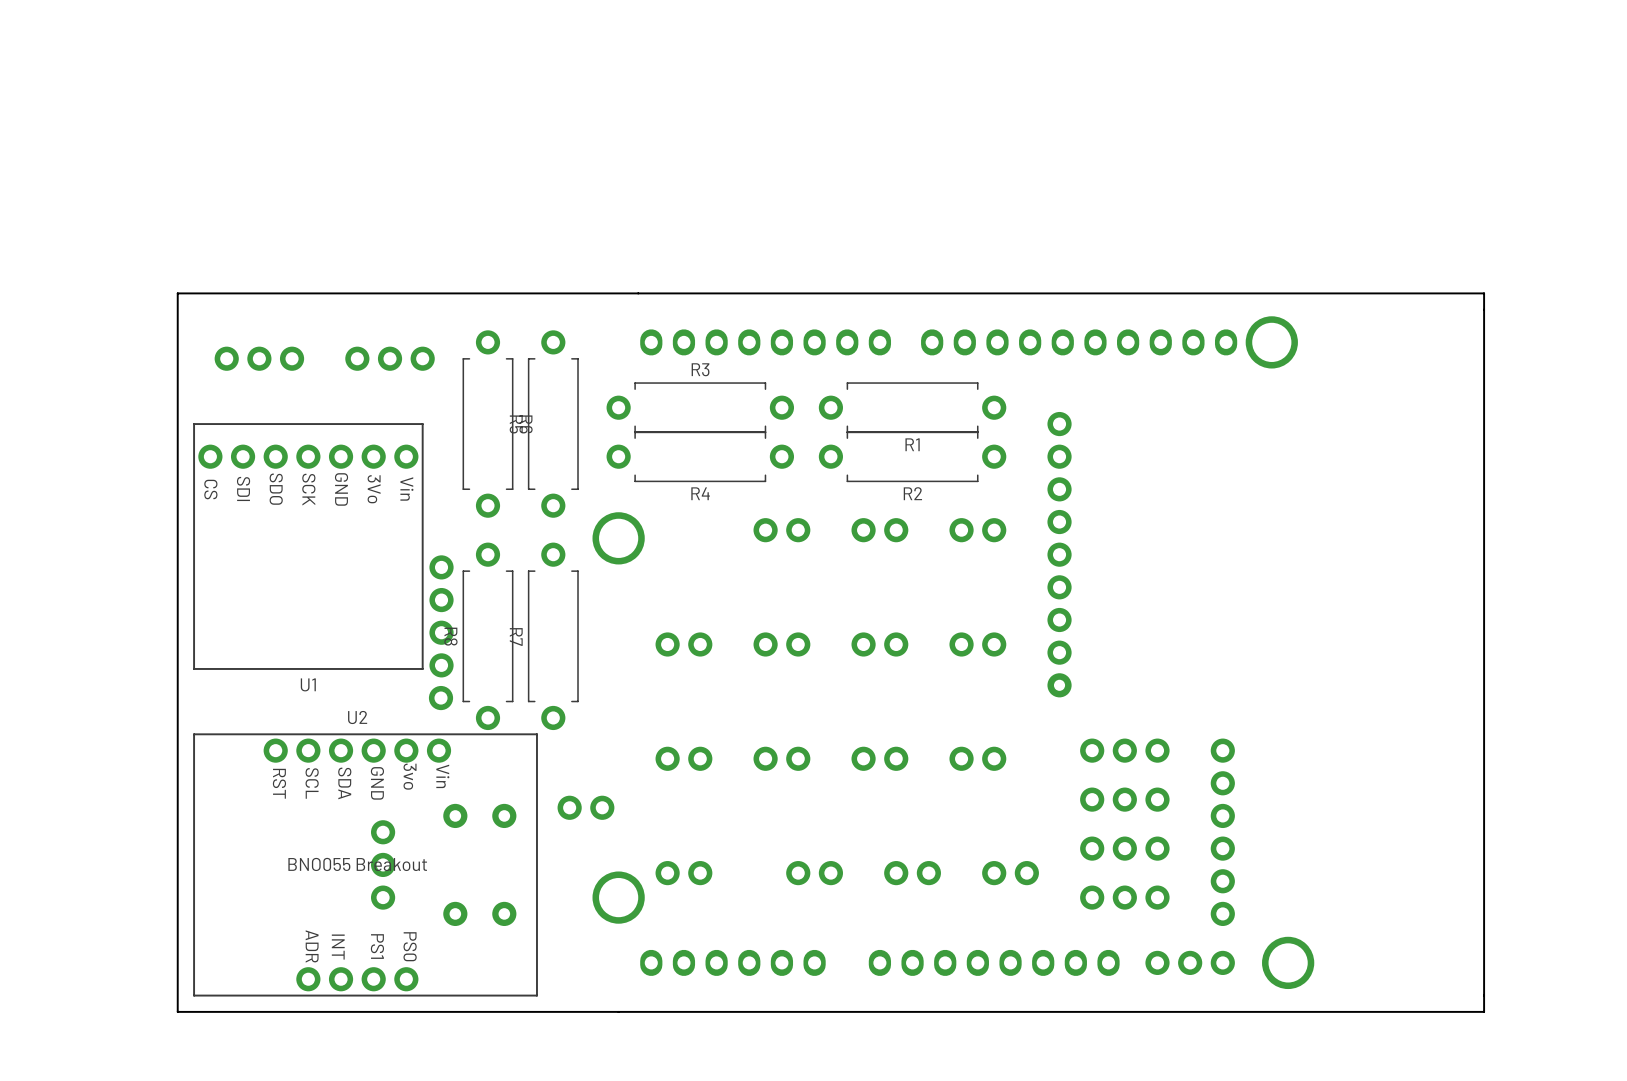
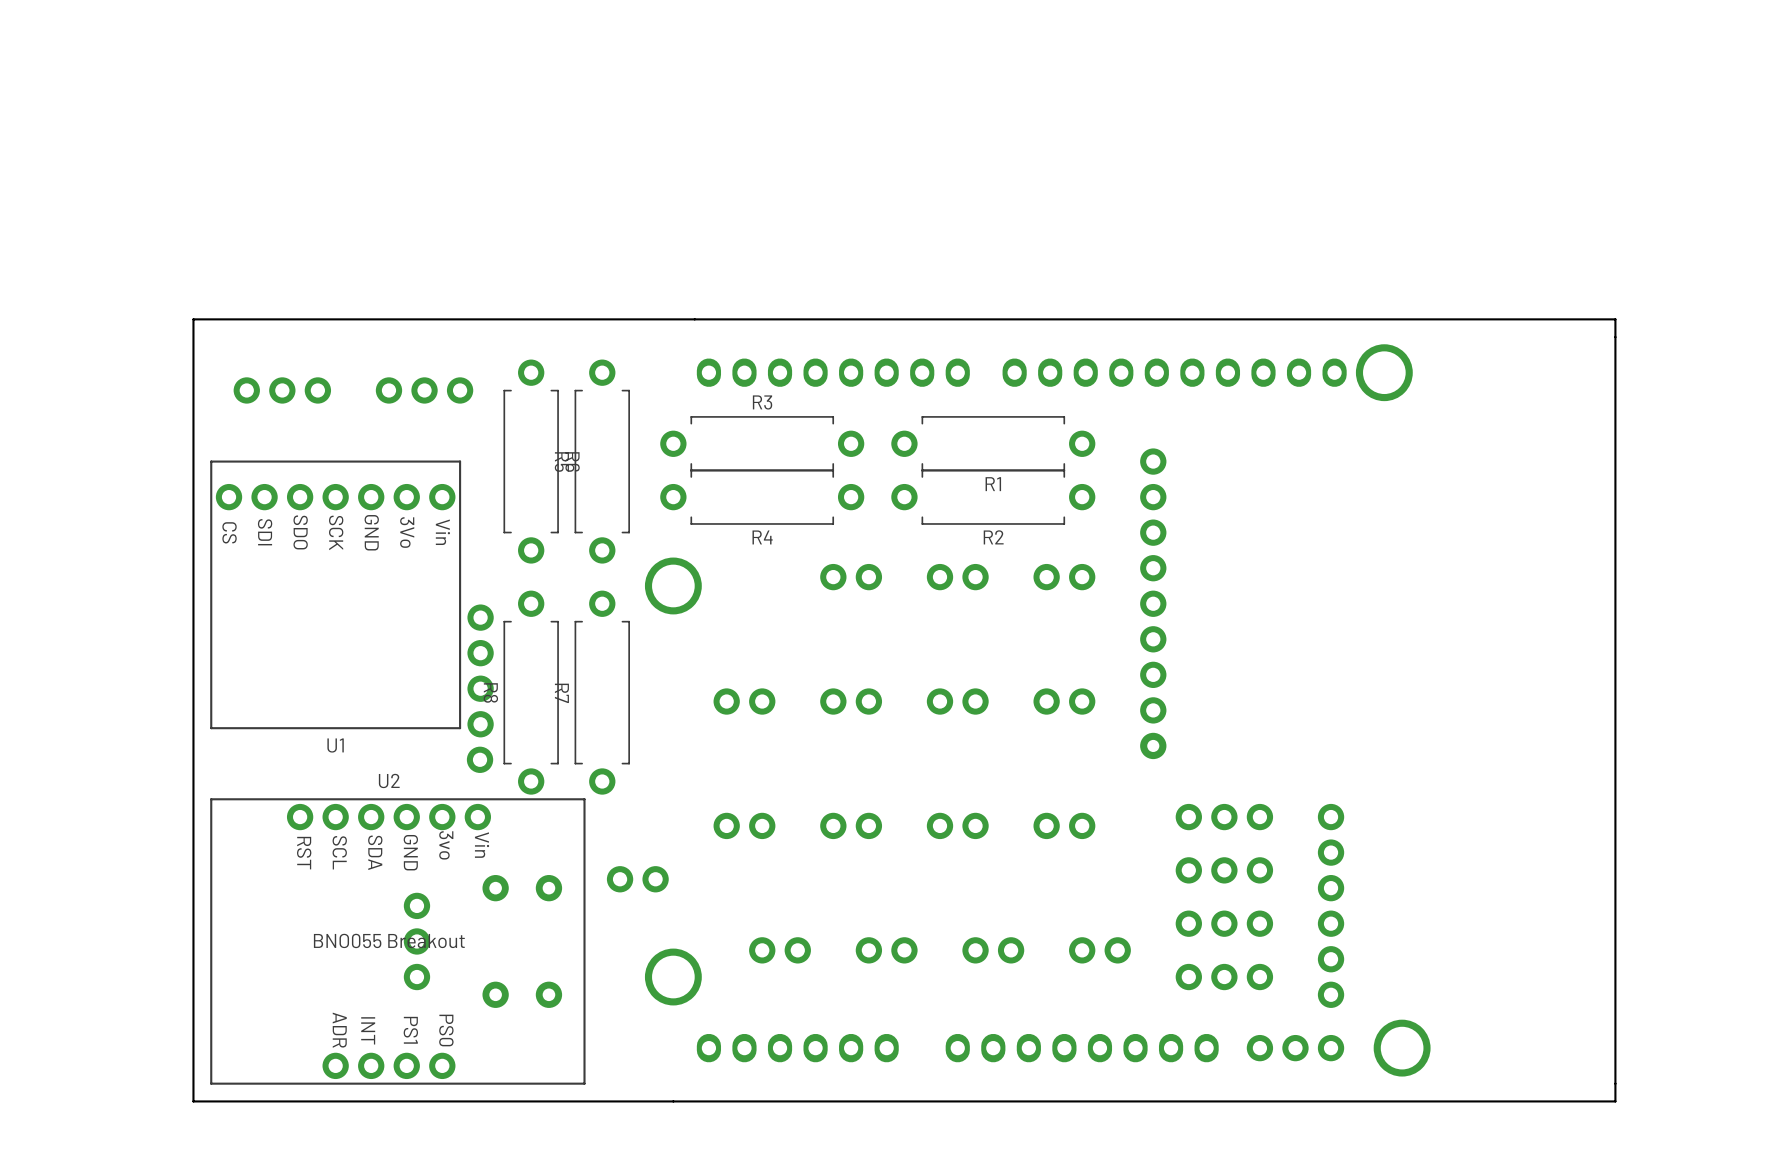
part position: (683, 873) -> (780, 950)

